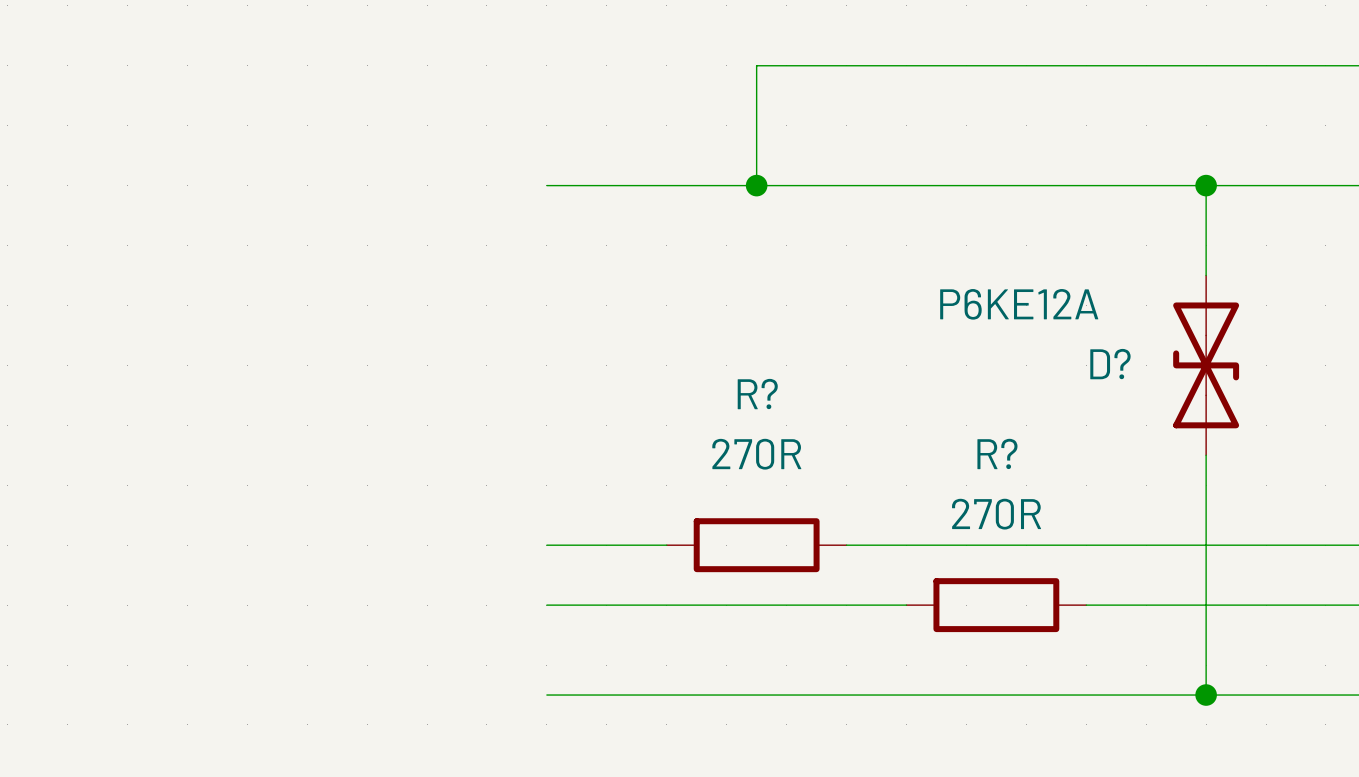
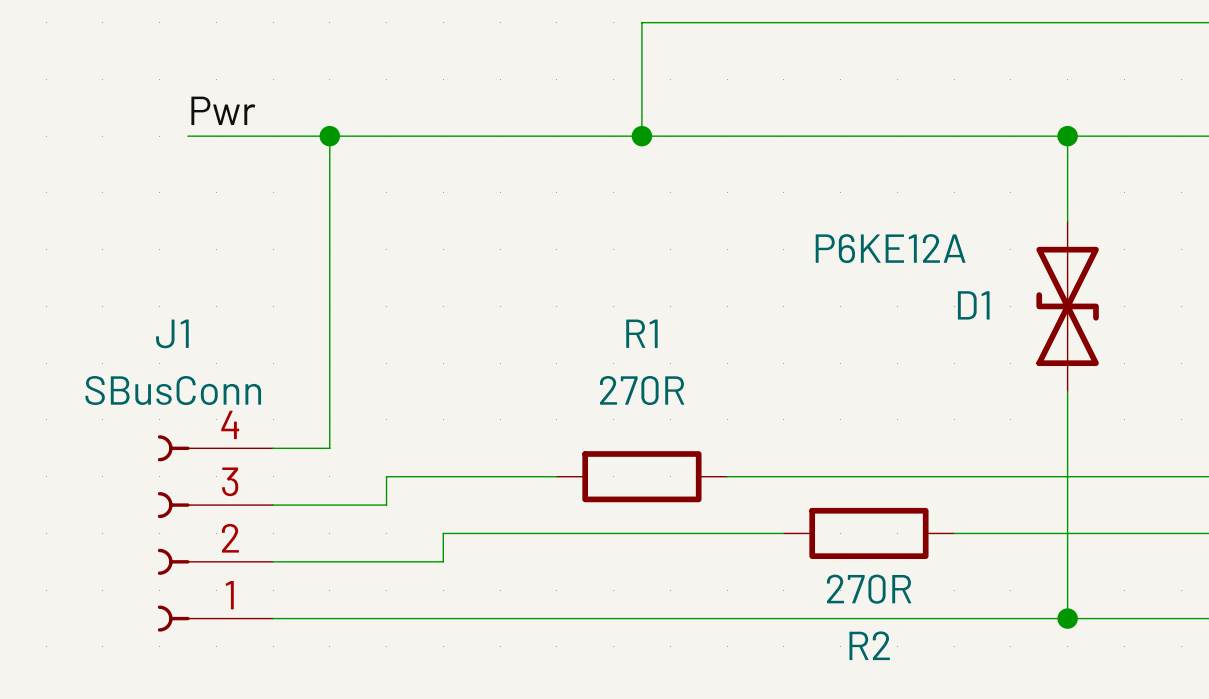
label: none -> Pwr (223, 110)
wire: none -> (187, 136) (443, 136)
wire: none -> (329, 136) (329, 448) (273, 448)
junction: none -> (329, 136)
D? name: D? (1110, 364) -> D1 (973, 305)
R? name: R? (757, 394) -> R1 (641, 333)
R? name: R? (997, 453) -> R2 (869, 645)
R? value position: 270R (996, 514) -> 270R (869, 589)
wire: none -> (443, 476) (386, 476) (386, 505) (273, 505)
J1: none -> SBusConn (215, 533)
wire: none -> (443, 533) (443, 561) (273, 561)
wire: none -> (273, 618) (443, 618)

